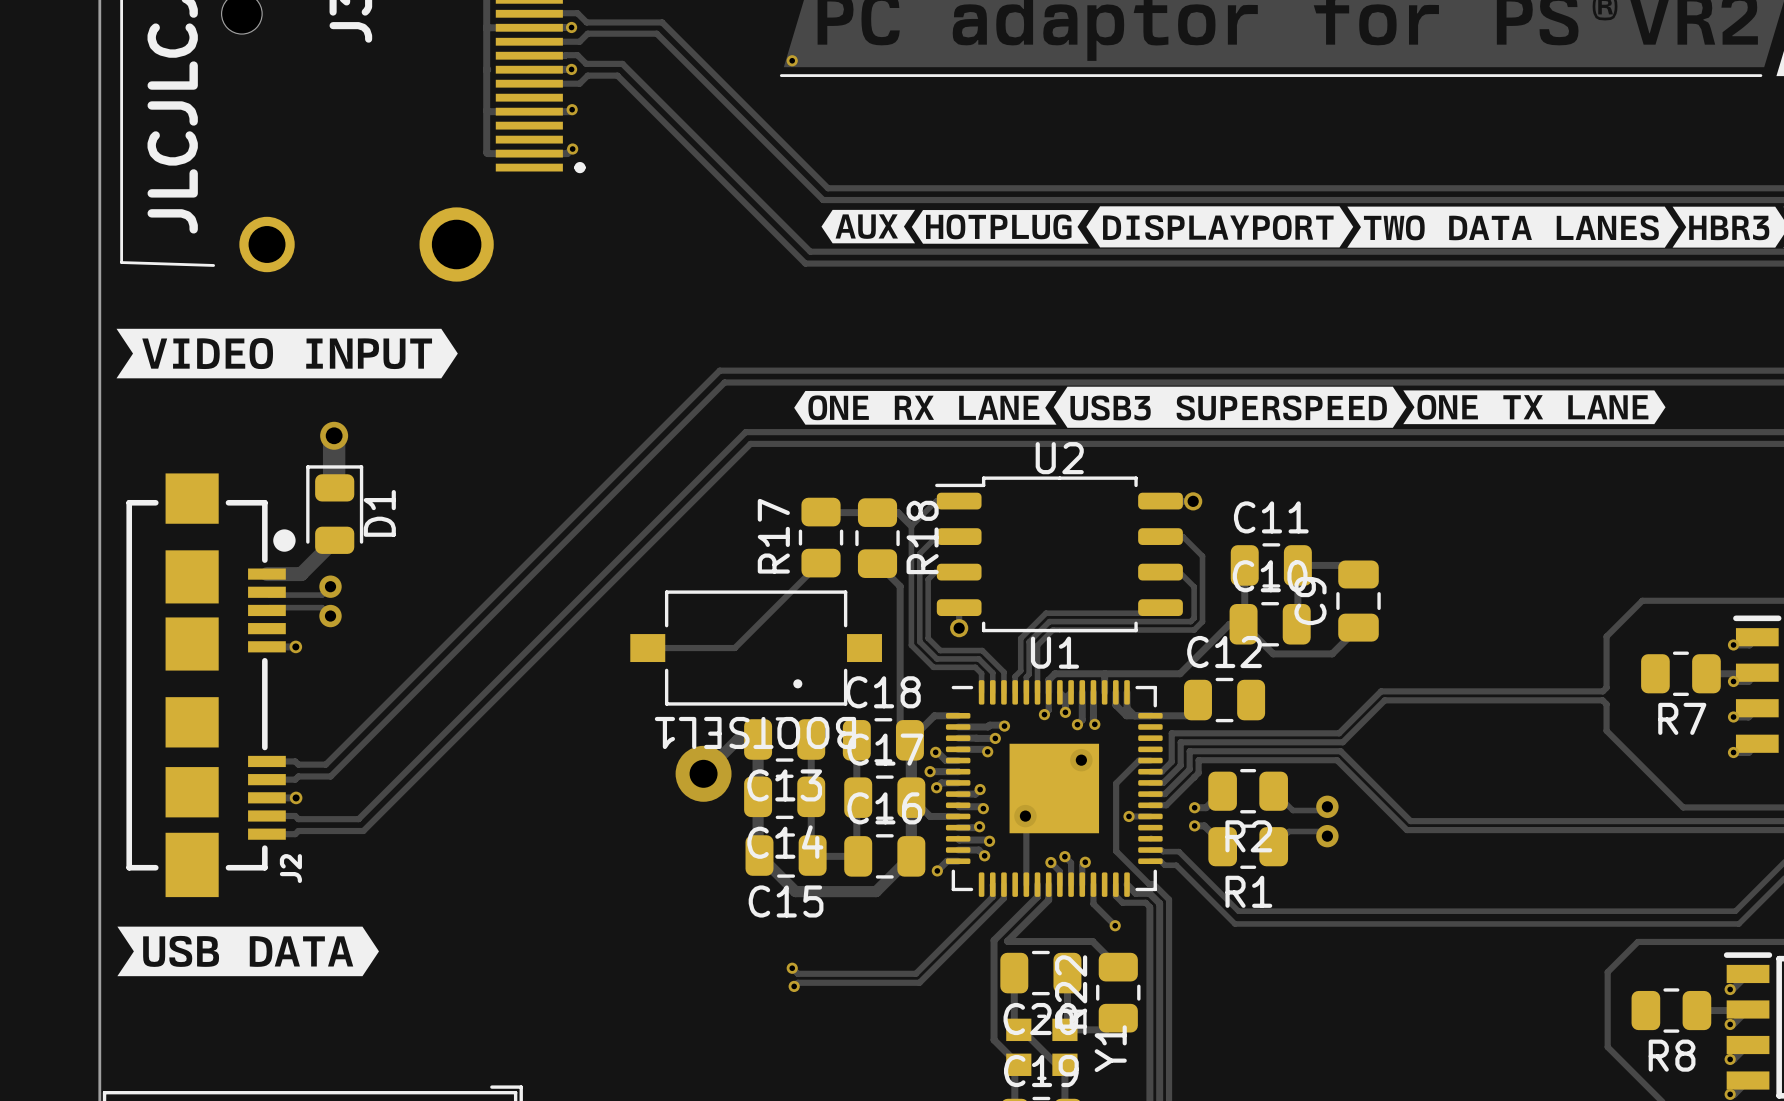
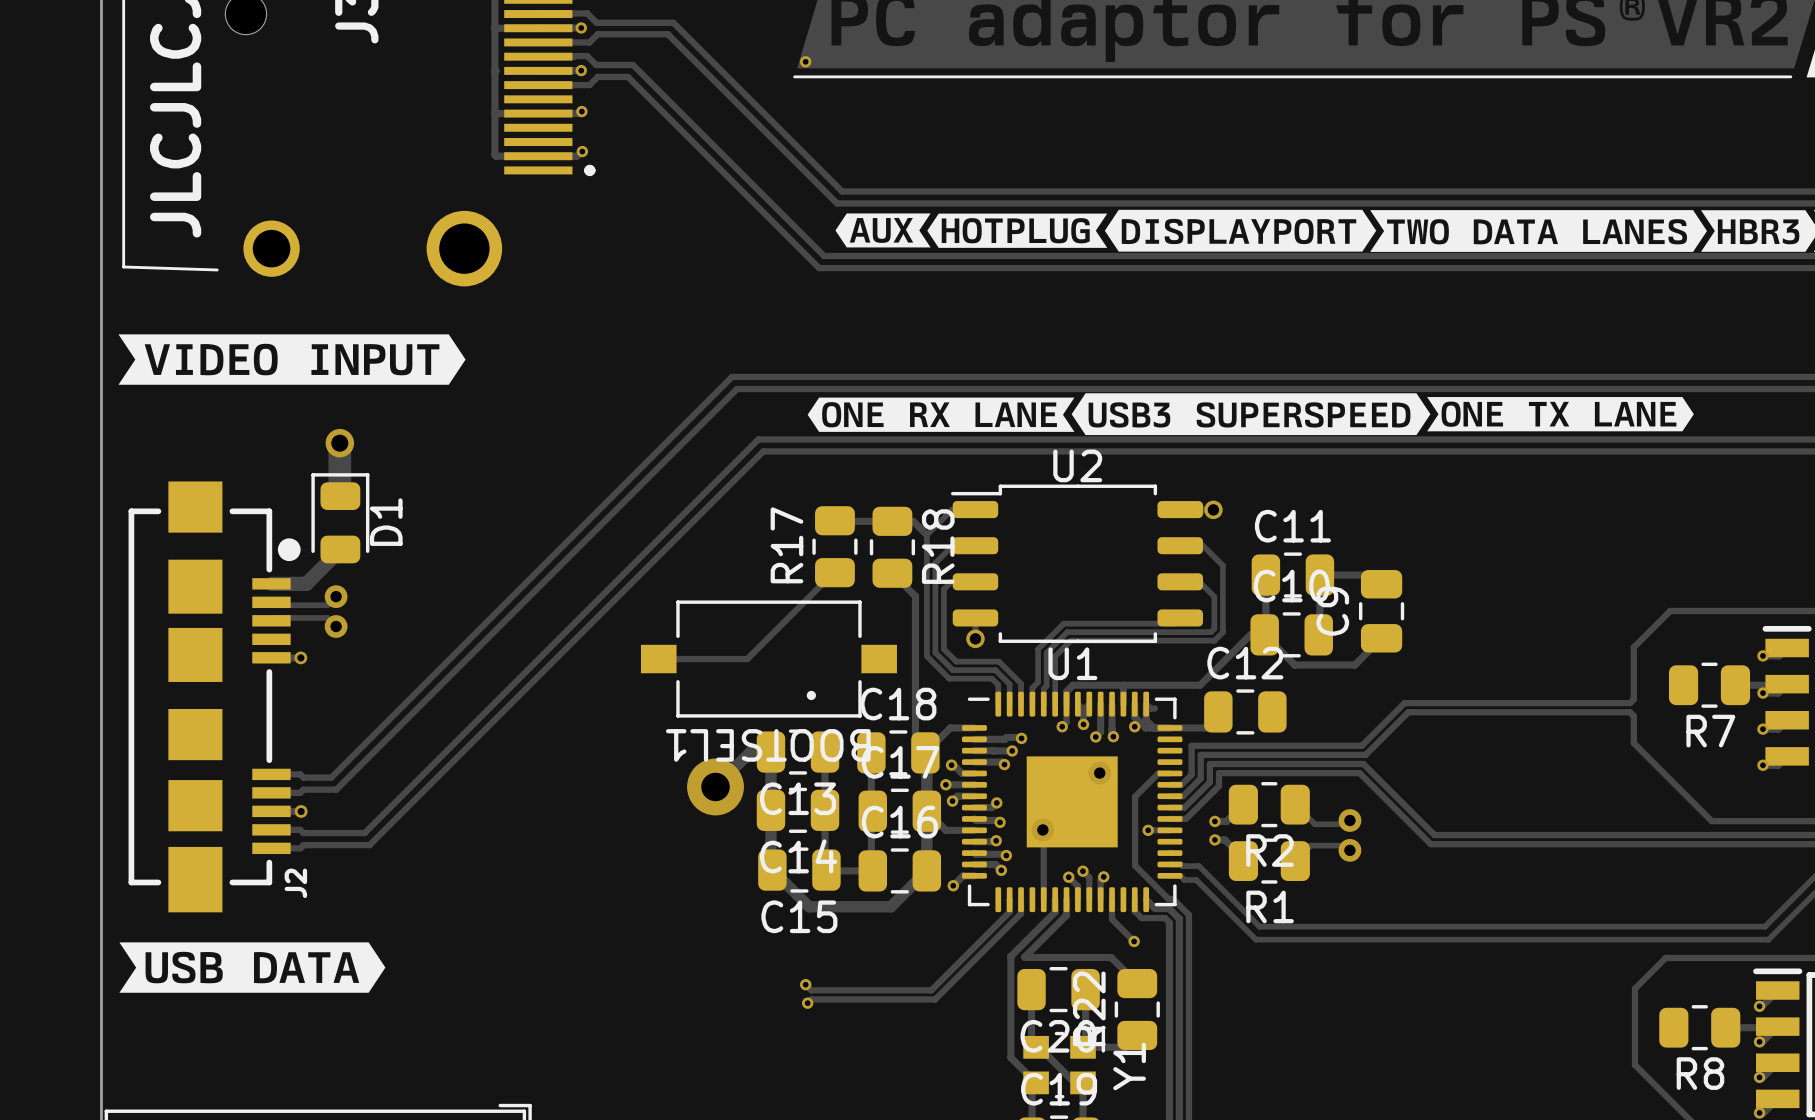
track: none -> (1146, 704) (1150, 708) (1154, 708)
via: none -> (1134, 726)

